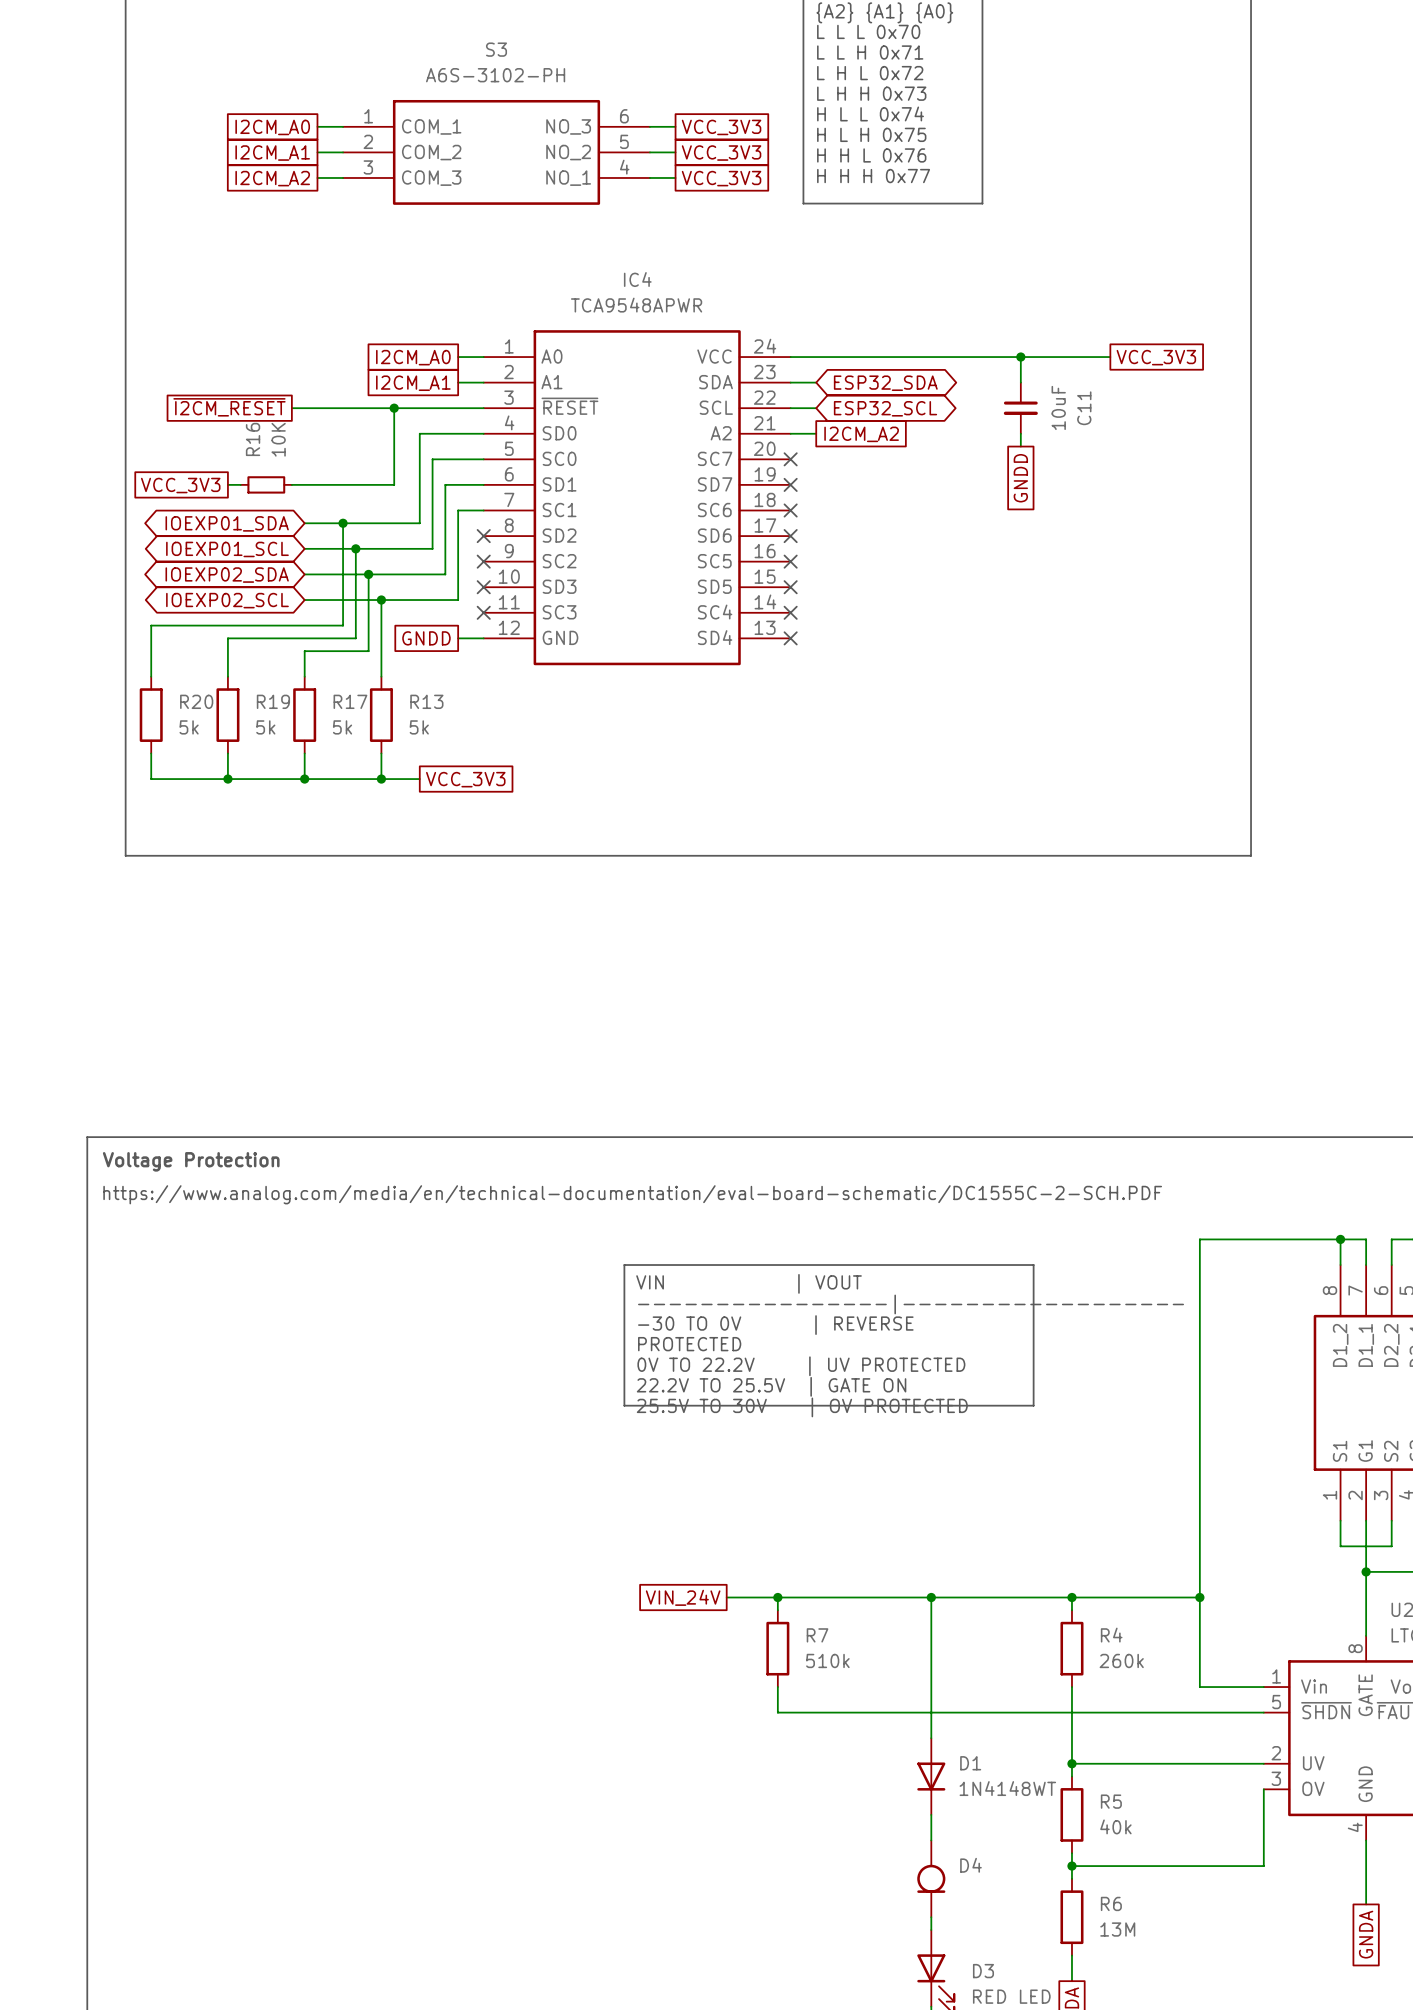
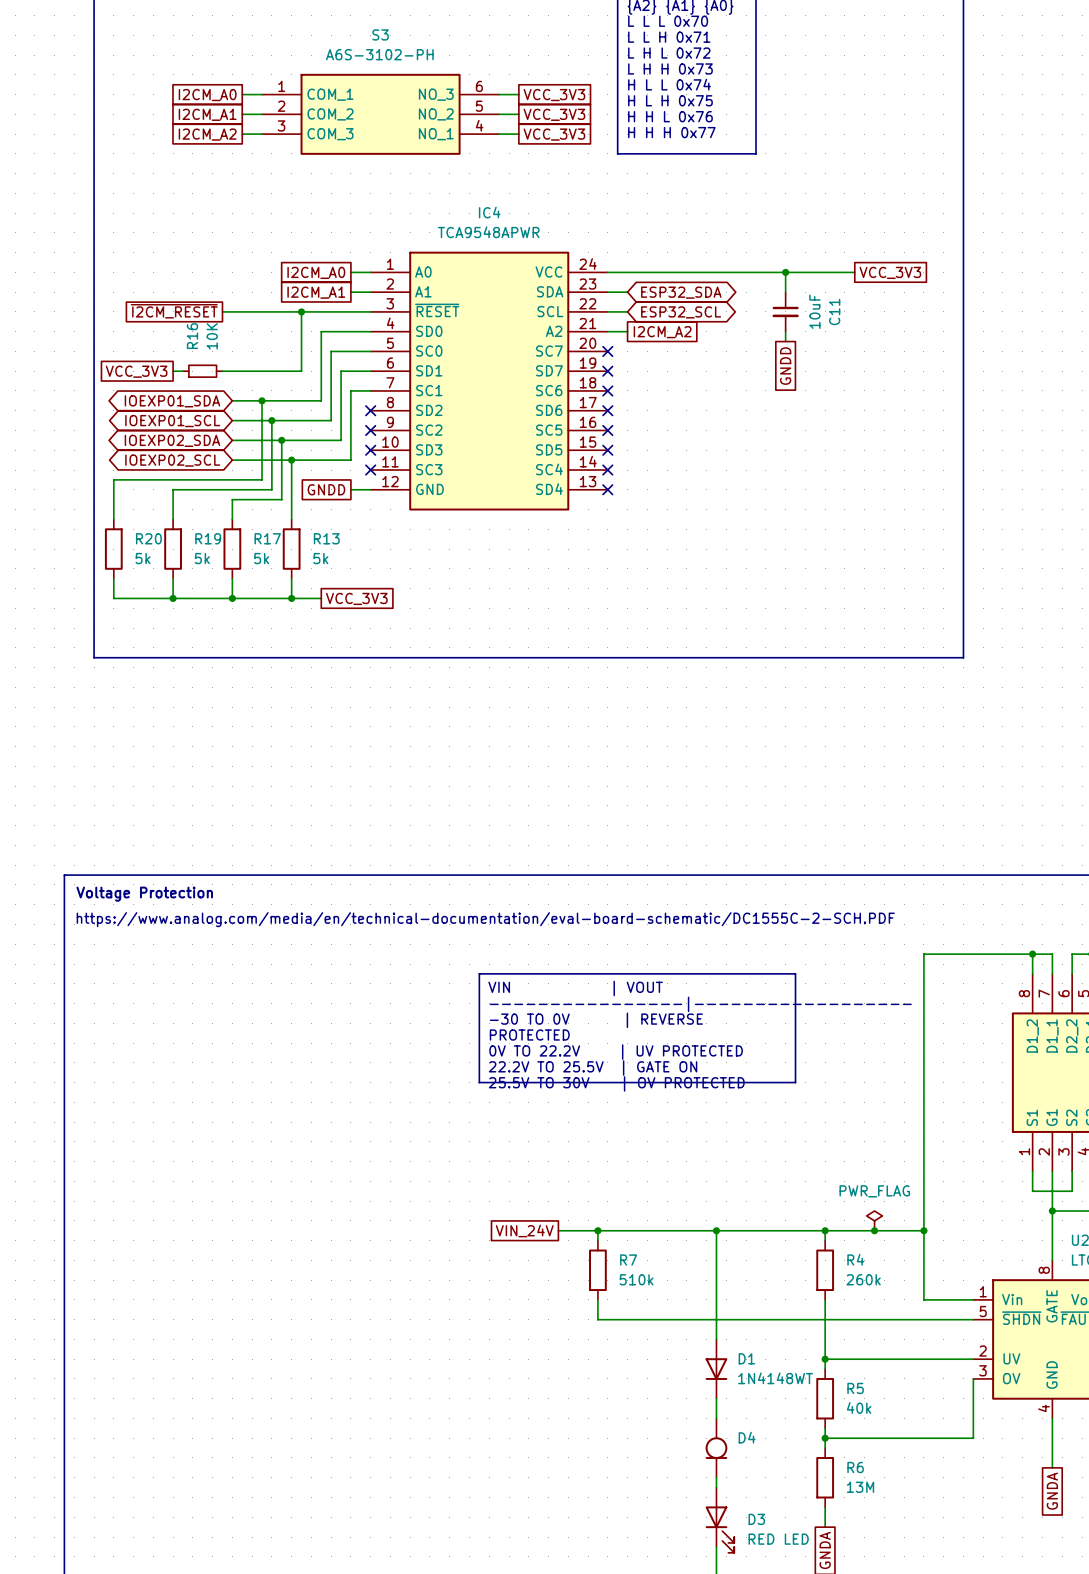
power symbol: none -> PWR_FLAG (874, 1220)
junction: none -> (874, 1230)

